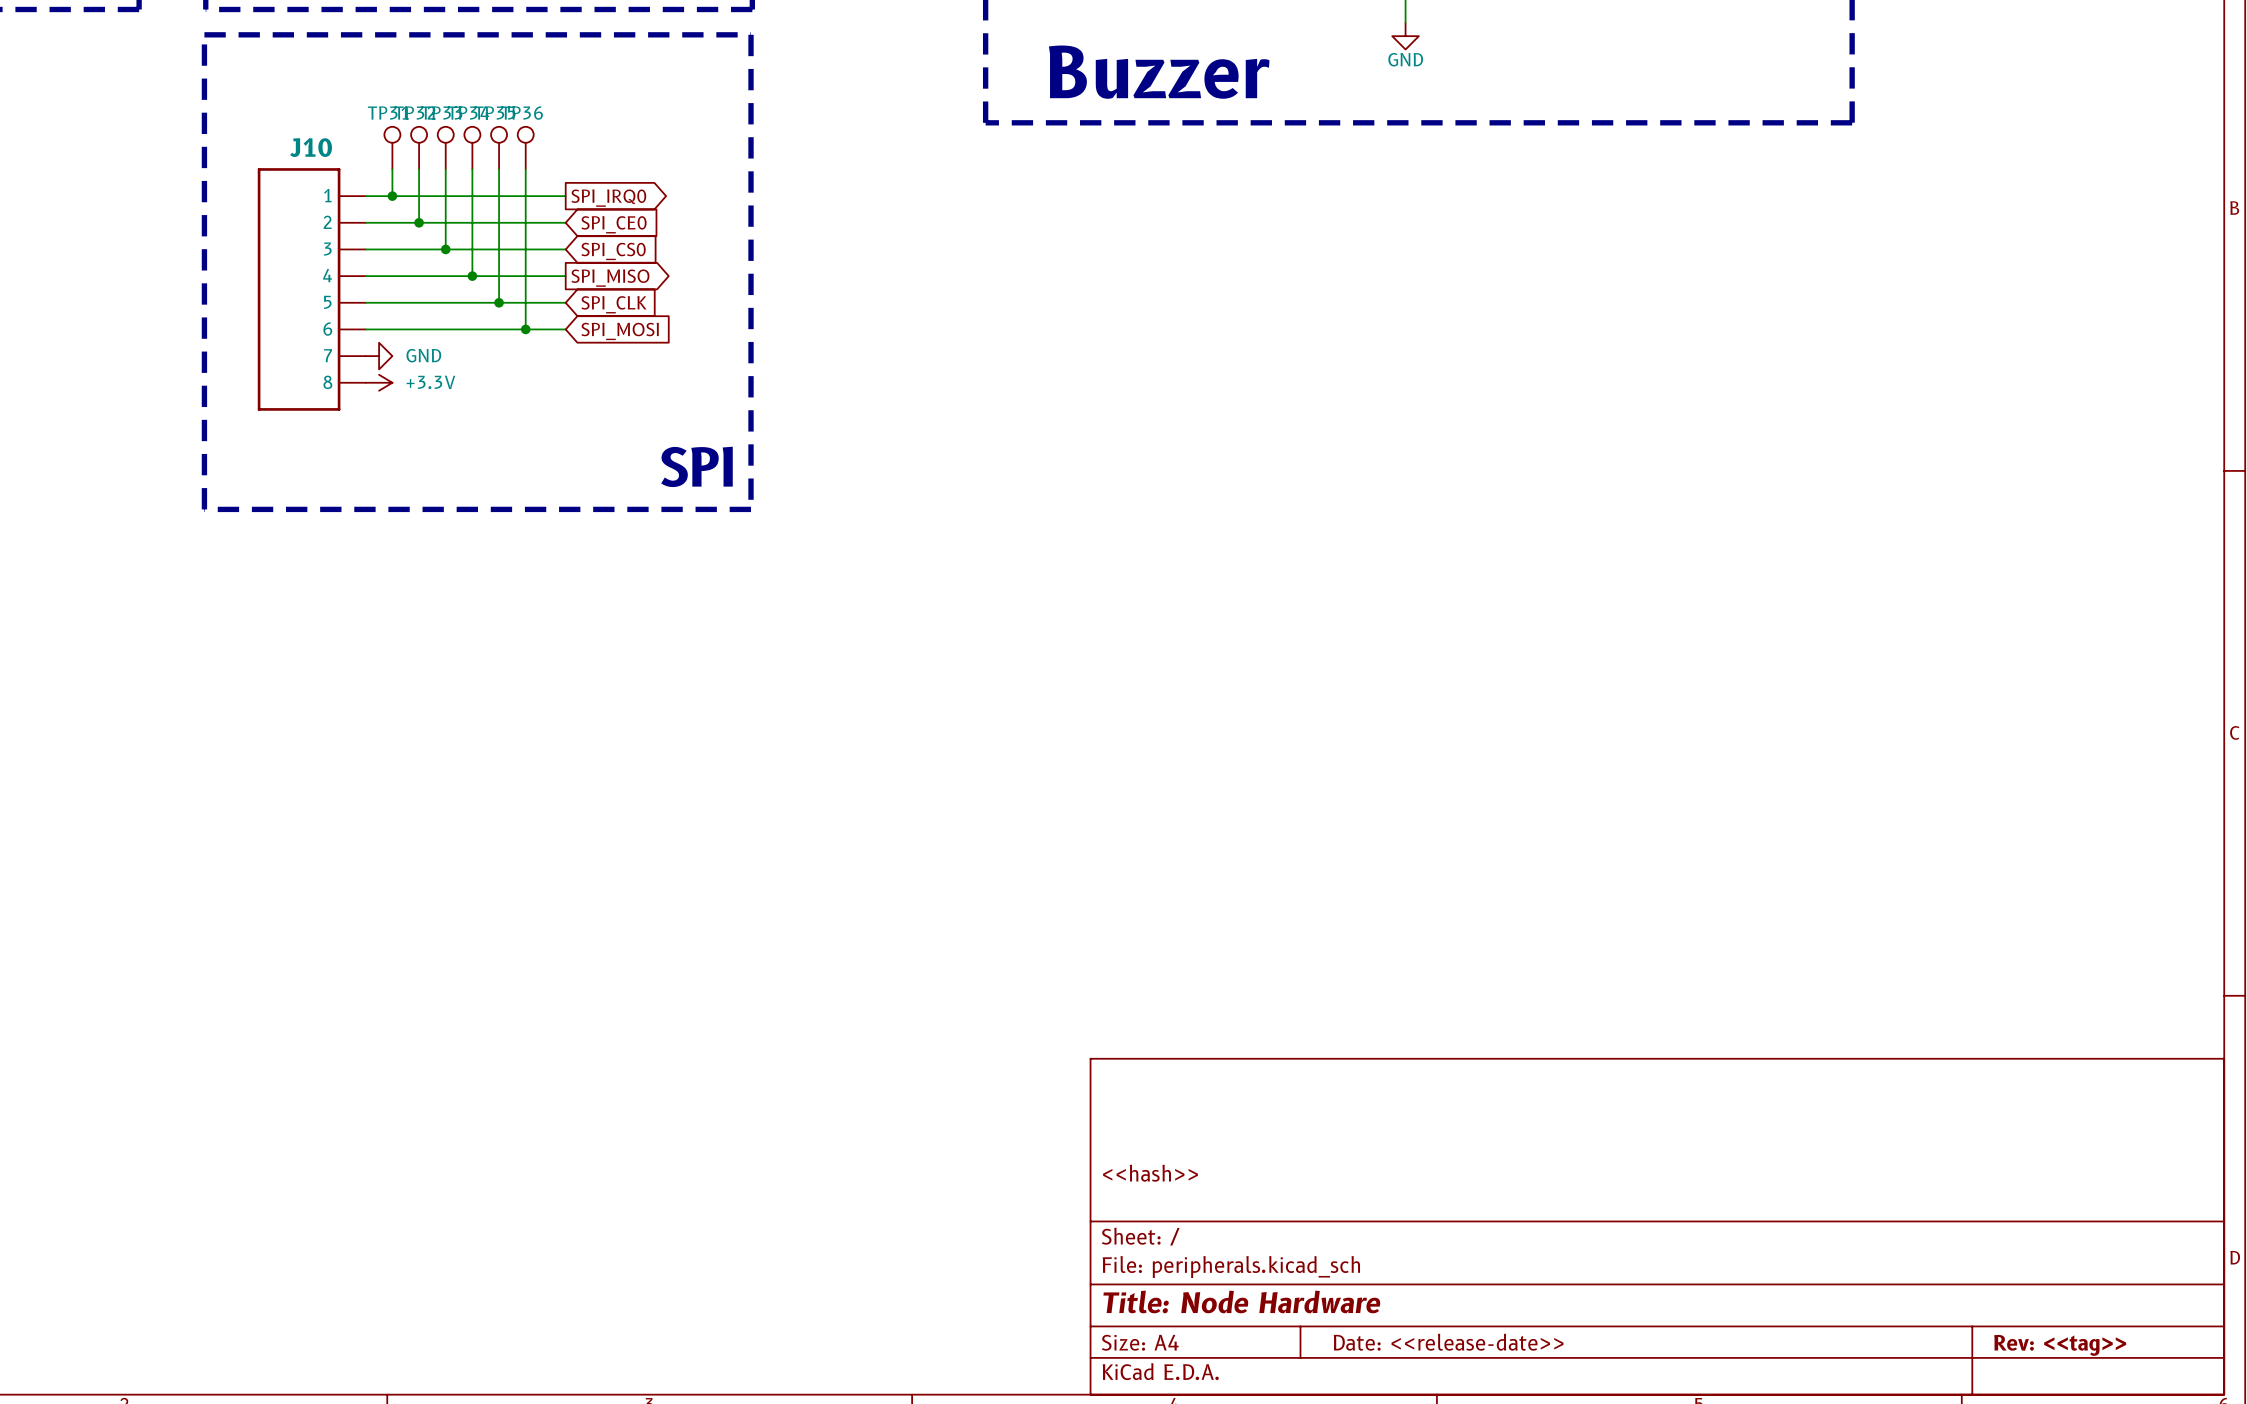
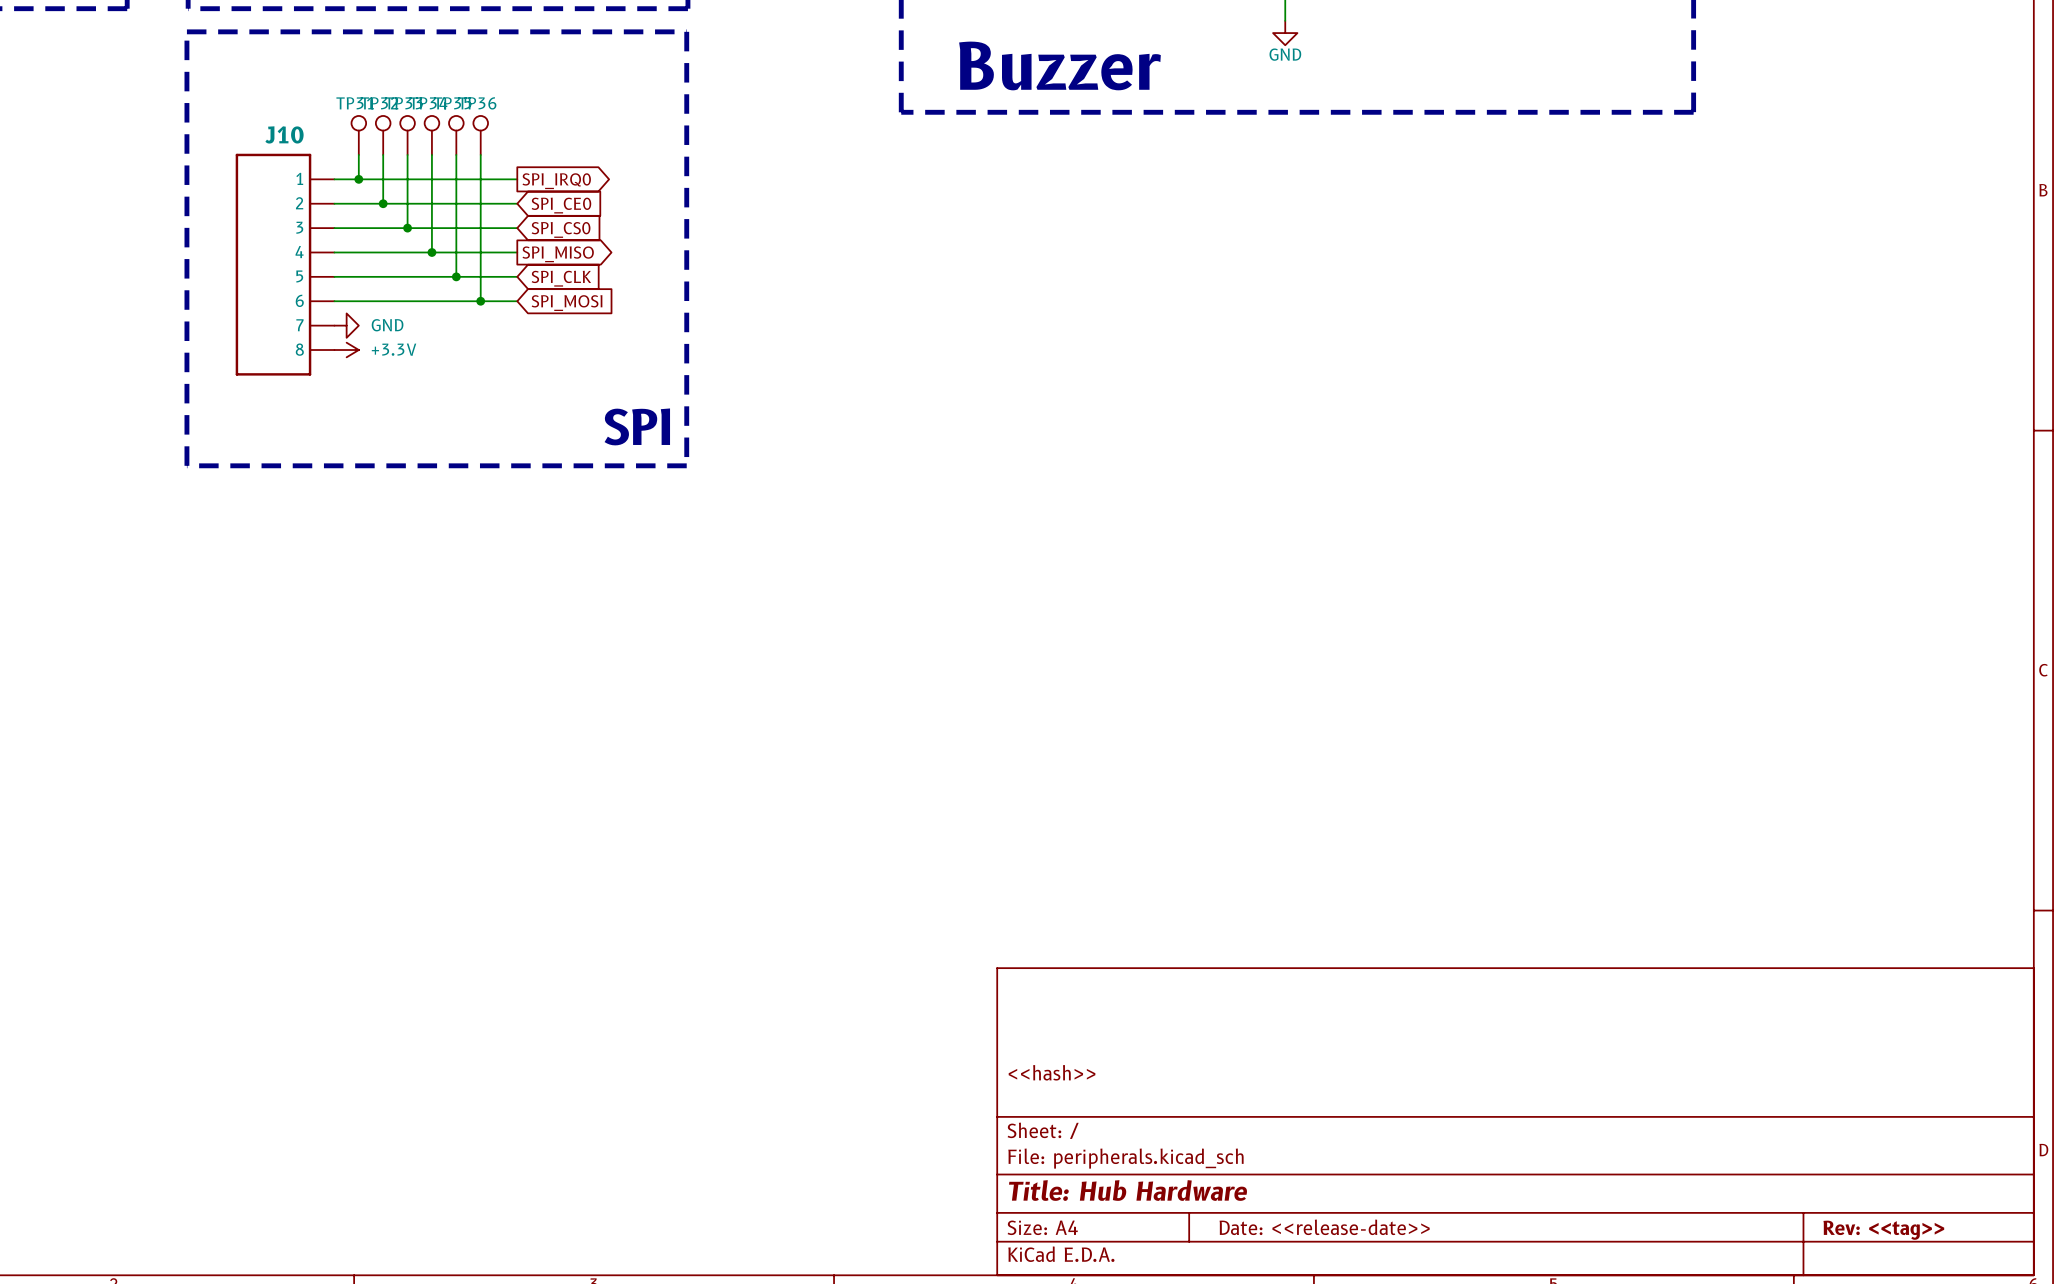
title block: Title: Node Hardware (1241, 1301) -> Title: Hub Hardware (1128, 1190)

